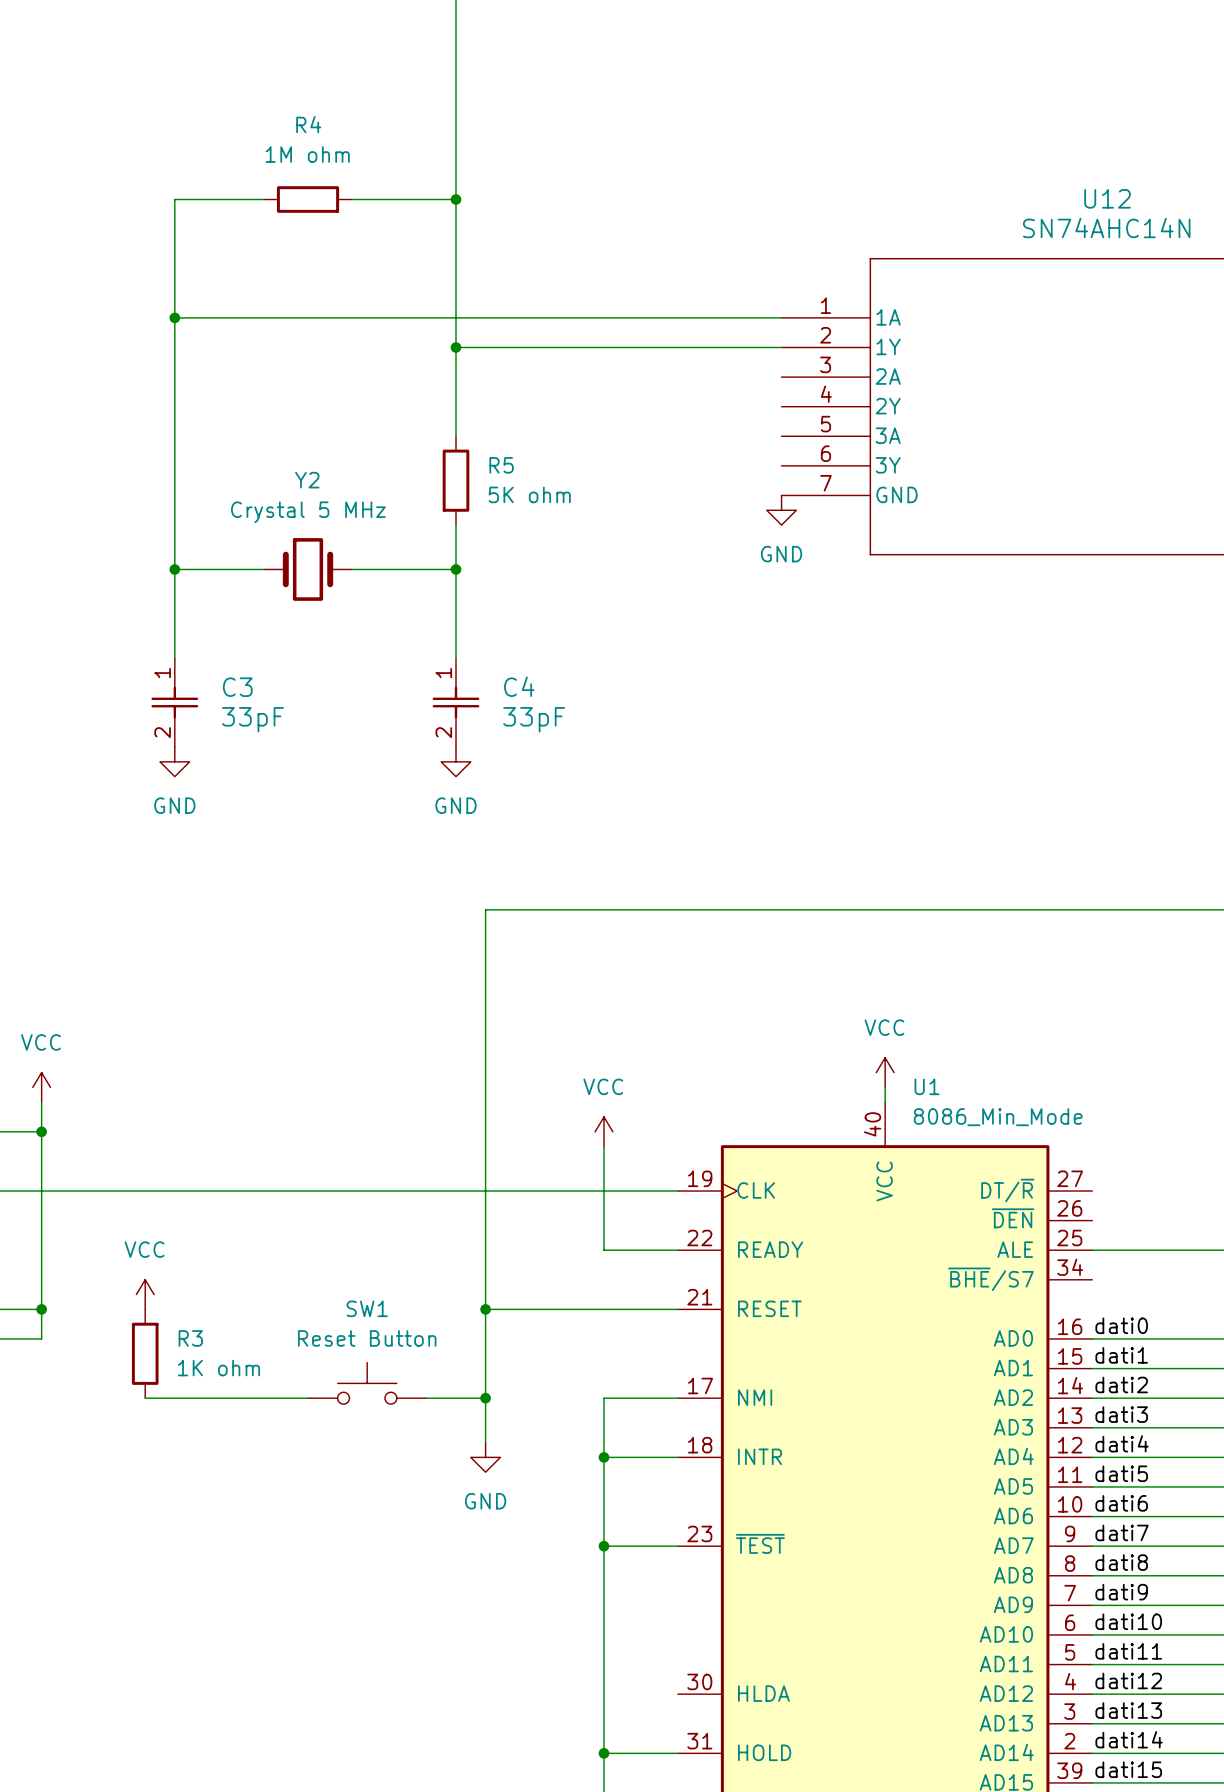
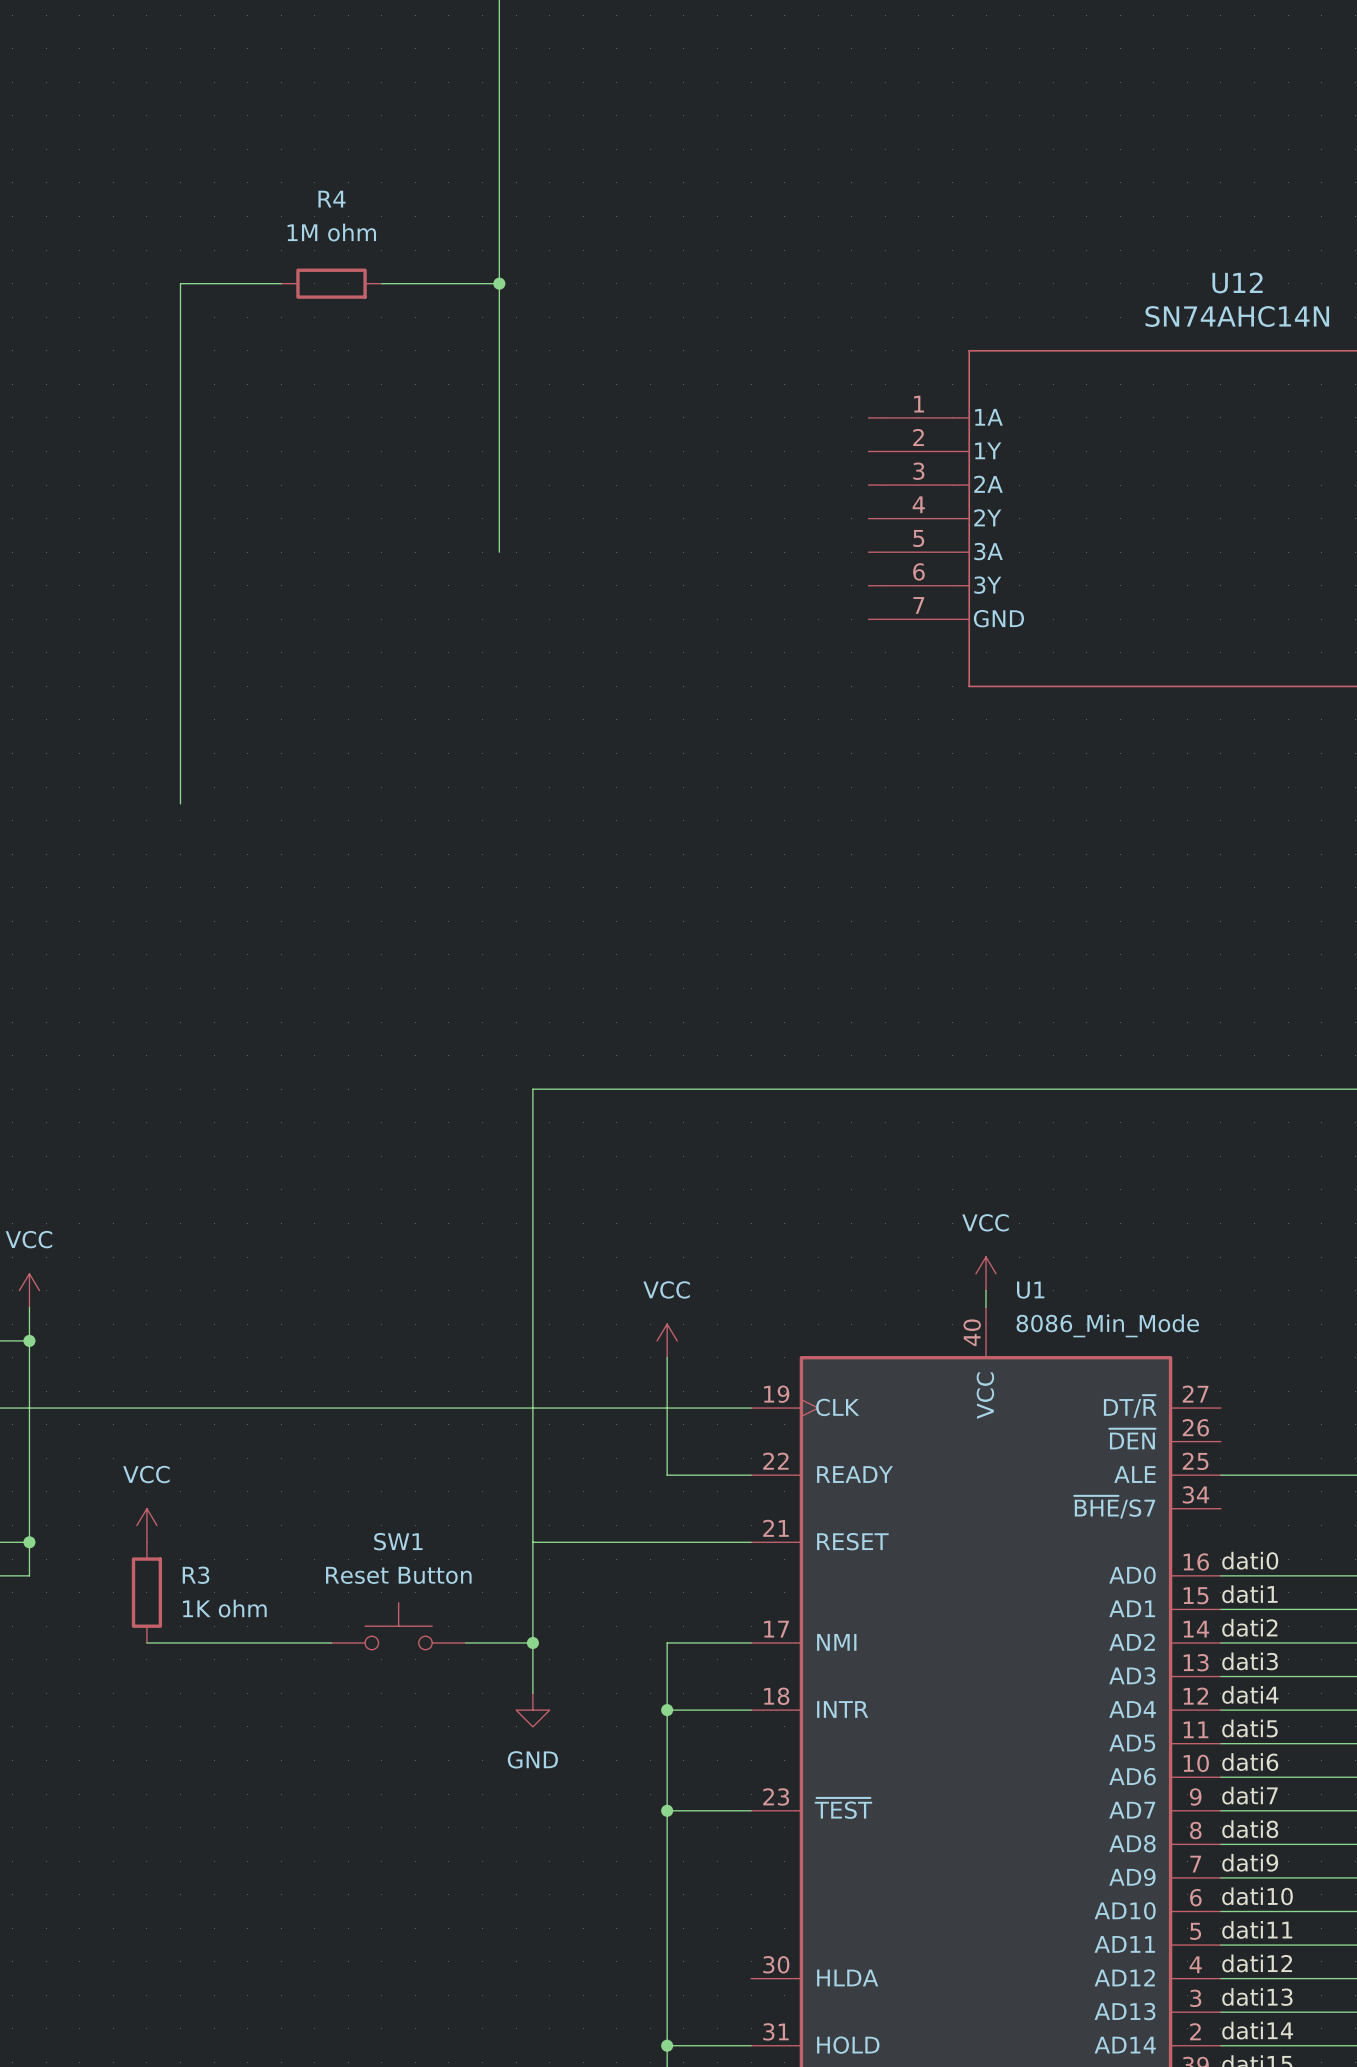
wire: (174, 317) (781, 317) -> none
junction: (174, 317) -> none
wire: (455, 347) (781, 347) -> none
junction: (455, 347) -> none
R5: 5K ohm (455, 480) -> none
power symbol: GND (781, 510) -> none
wire: (455, 525) (455, 658) -> none
wire: (174, 569) (263, 569) -> none
junction: (174, 569) -> none
Y2: Crystal 5 MHz (308, 569) -> none
wire: (352, 569) (455, 569) -> none
junction: (455, 569) -> none
C3: 33pF (174, 702) -> none
C4: 33pF (455, 702) -> none
power symbol: GND (174, 761) -> none
power symbol: GND (455, 761) -> none
junction: (485, 1309) -> none

